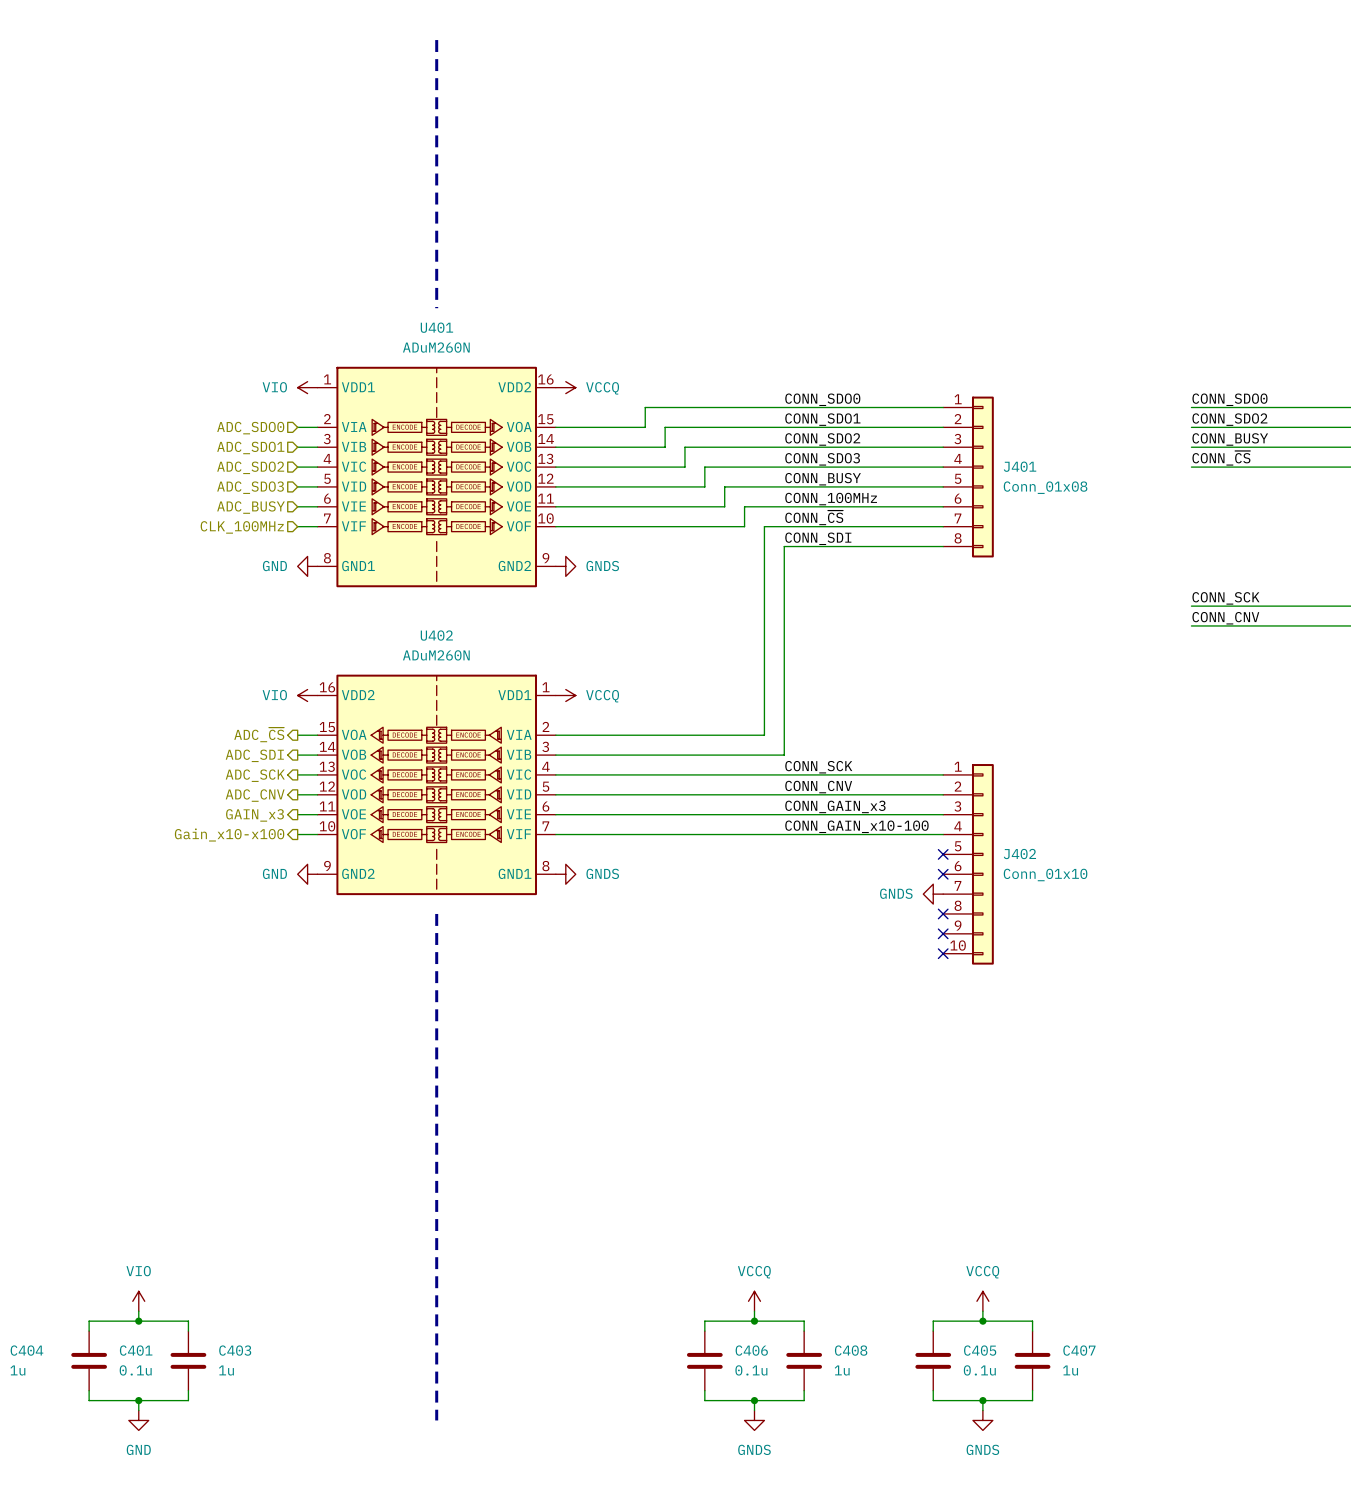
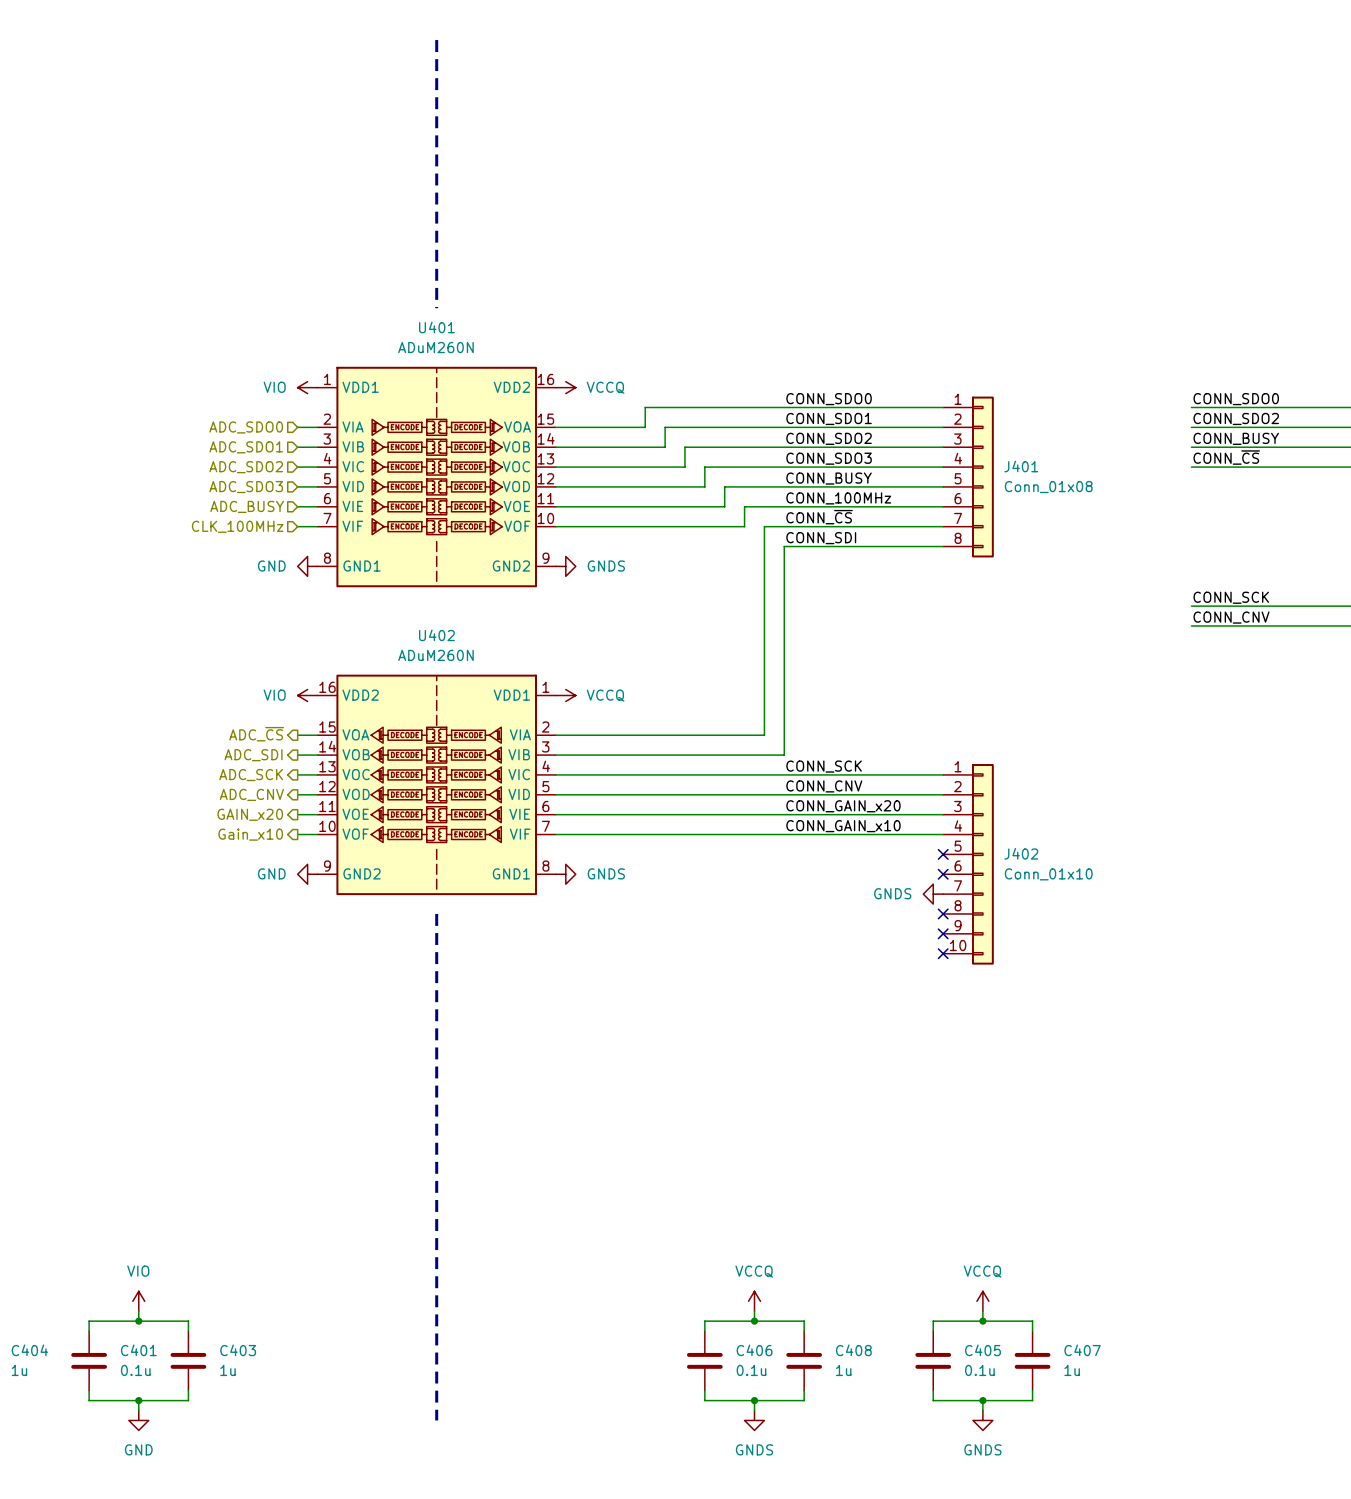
label: CONN_GAIN_x3 (835, 806) -> CONN_GAIN_x20 (843, 806)
hierarchical label: GAIN_x3 (254, 815) -> GAIN_x20 (250, 814)
label: CONN_GAIN_x10-100 (856, 826) -> CONN_GAIN_x10 (843, 826)
hierarchical label: Gain_x10-x100 (229, 835) -> Gain_x10 (250, 834)

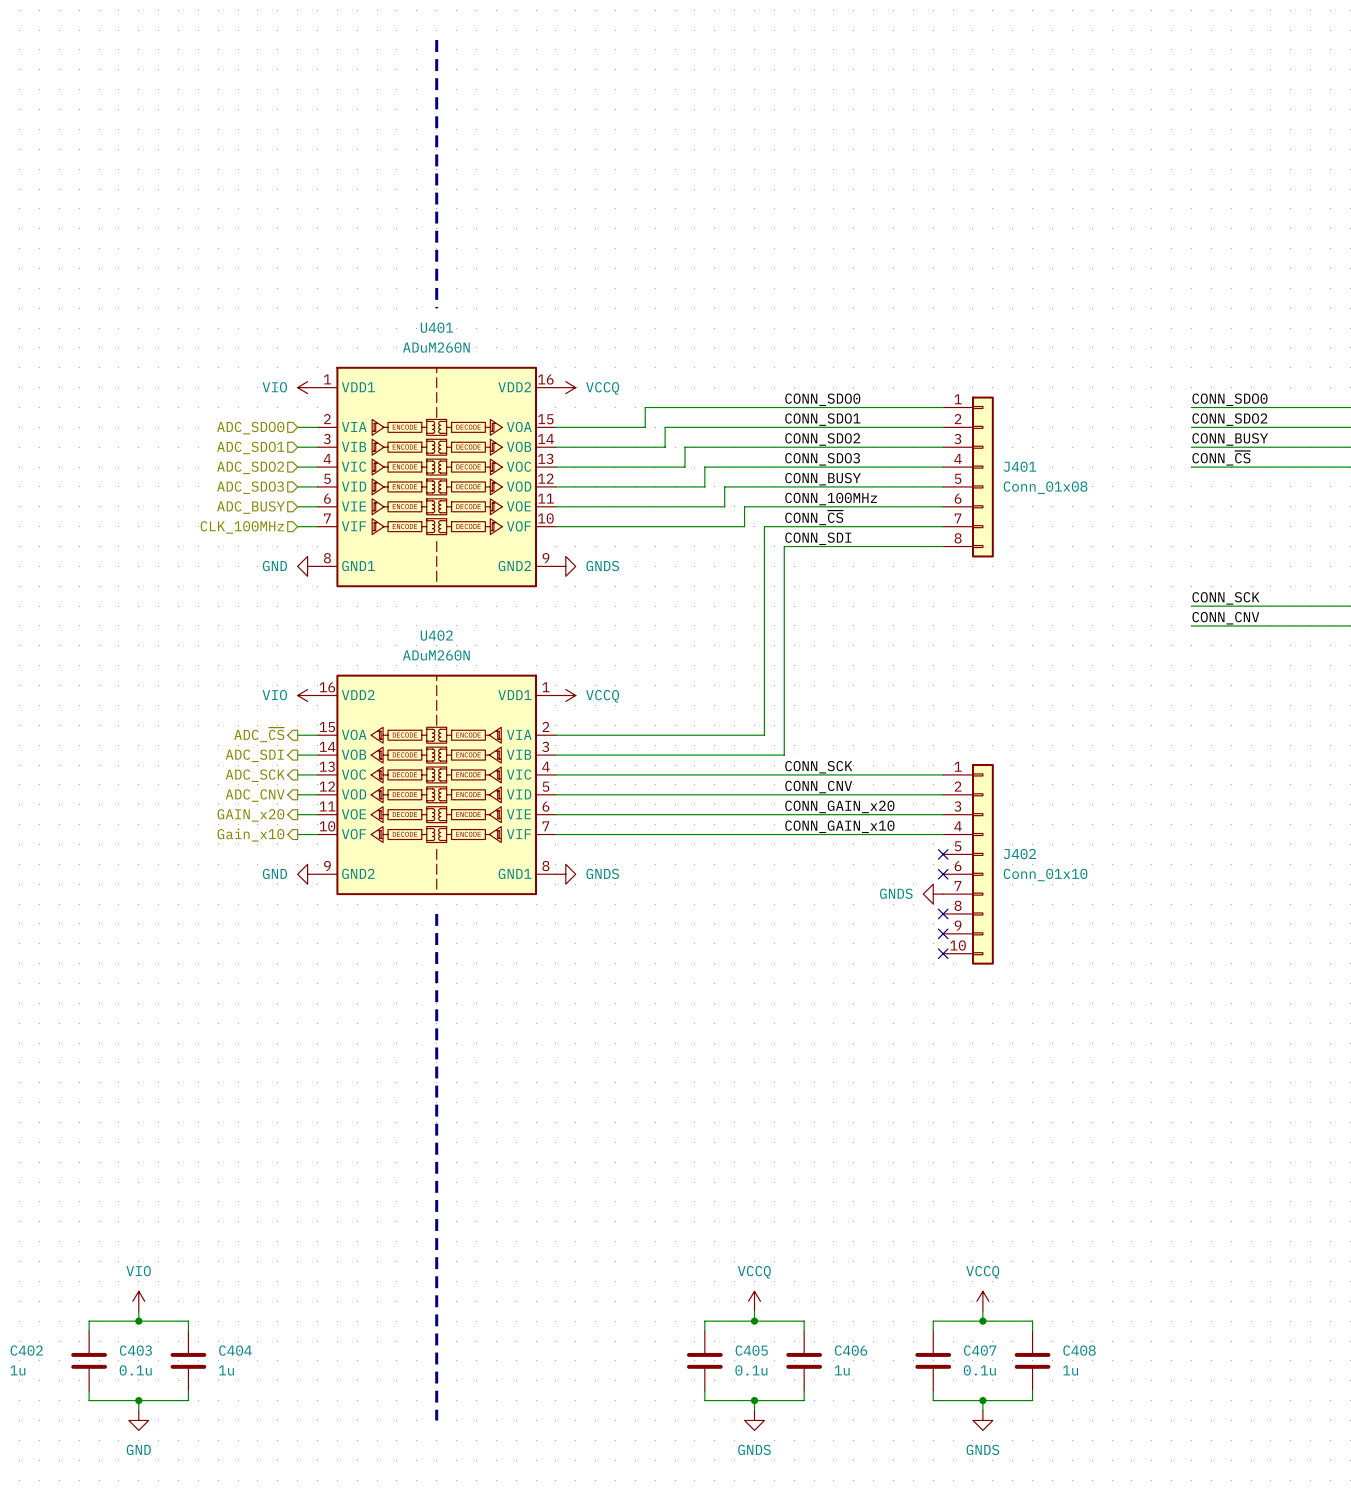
C404 name: C404 (29, 1350) -> C402 (26, 1350)
C401 name: C401 (138, 1350) -> C403 (135, 1350)
C403 name: C403 (238, 1350) -> C404 (235, 1350)
C406 name: C406 (754, 1350) -> C405 (751, 1350)
C408 name: C408 (853, 1350) -> C406 (851, 1350)
C405 name: C405 (982, 1350) -> C407 (980, 1350)
C407 name: C407 (1082, 1350) -> C408 (1079, 1350)

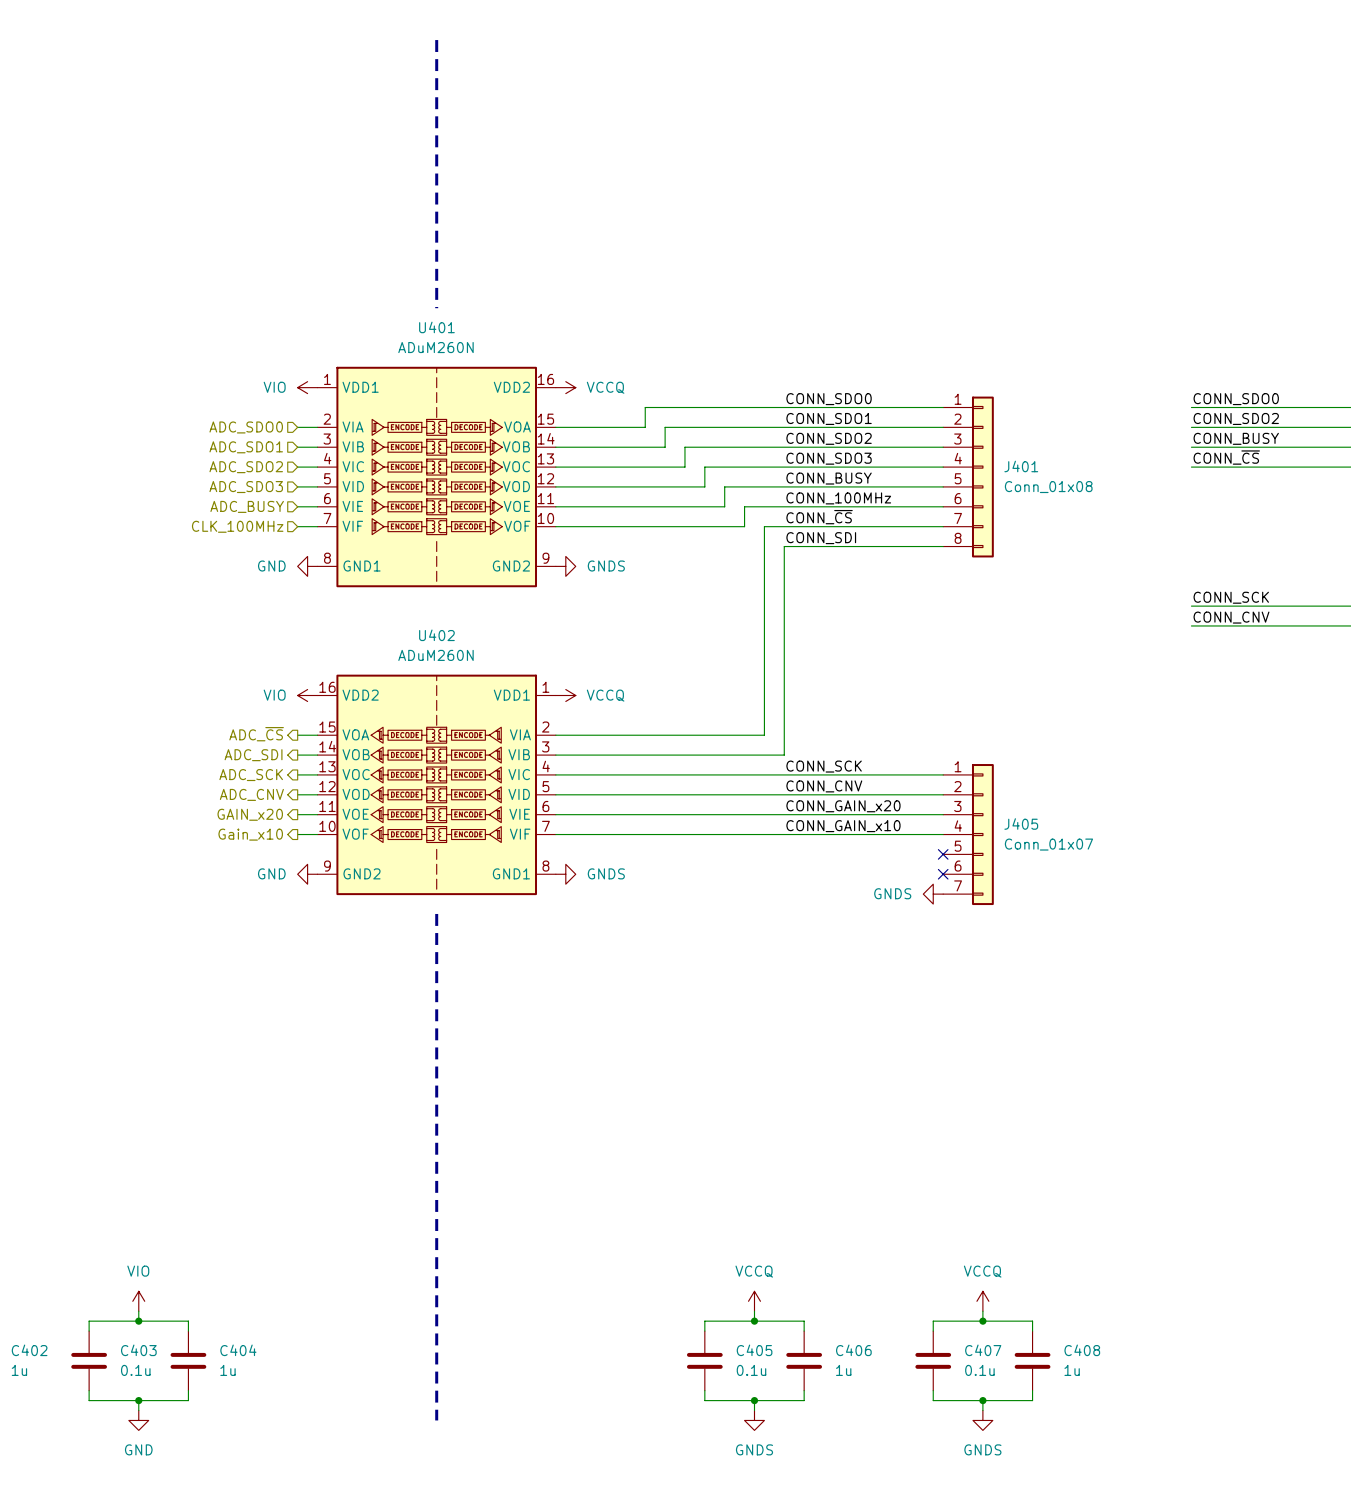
J405: none -> Conn_01x07 (968, 834)
J402: Conn_01x10 (968, 864) -> none
no-connect mark: (943, 913) -> none
no-connect mark: (943, 933) -> none
no-connect mark: (943, 953) -> none

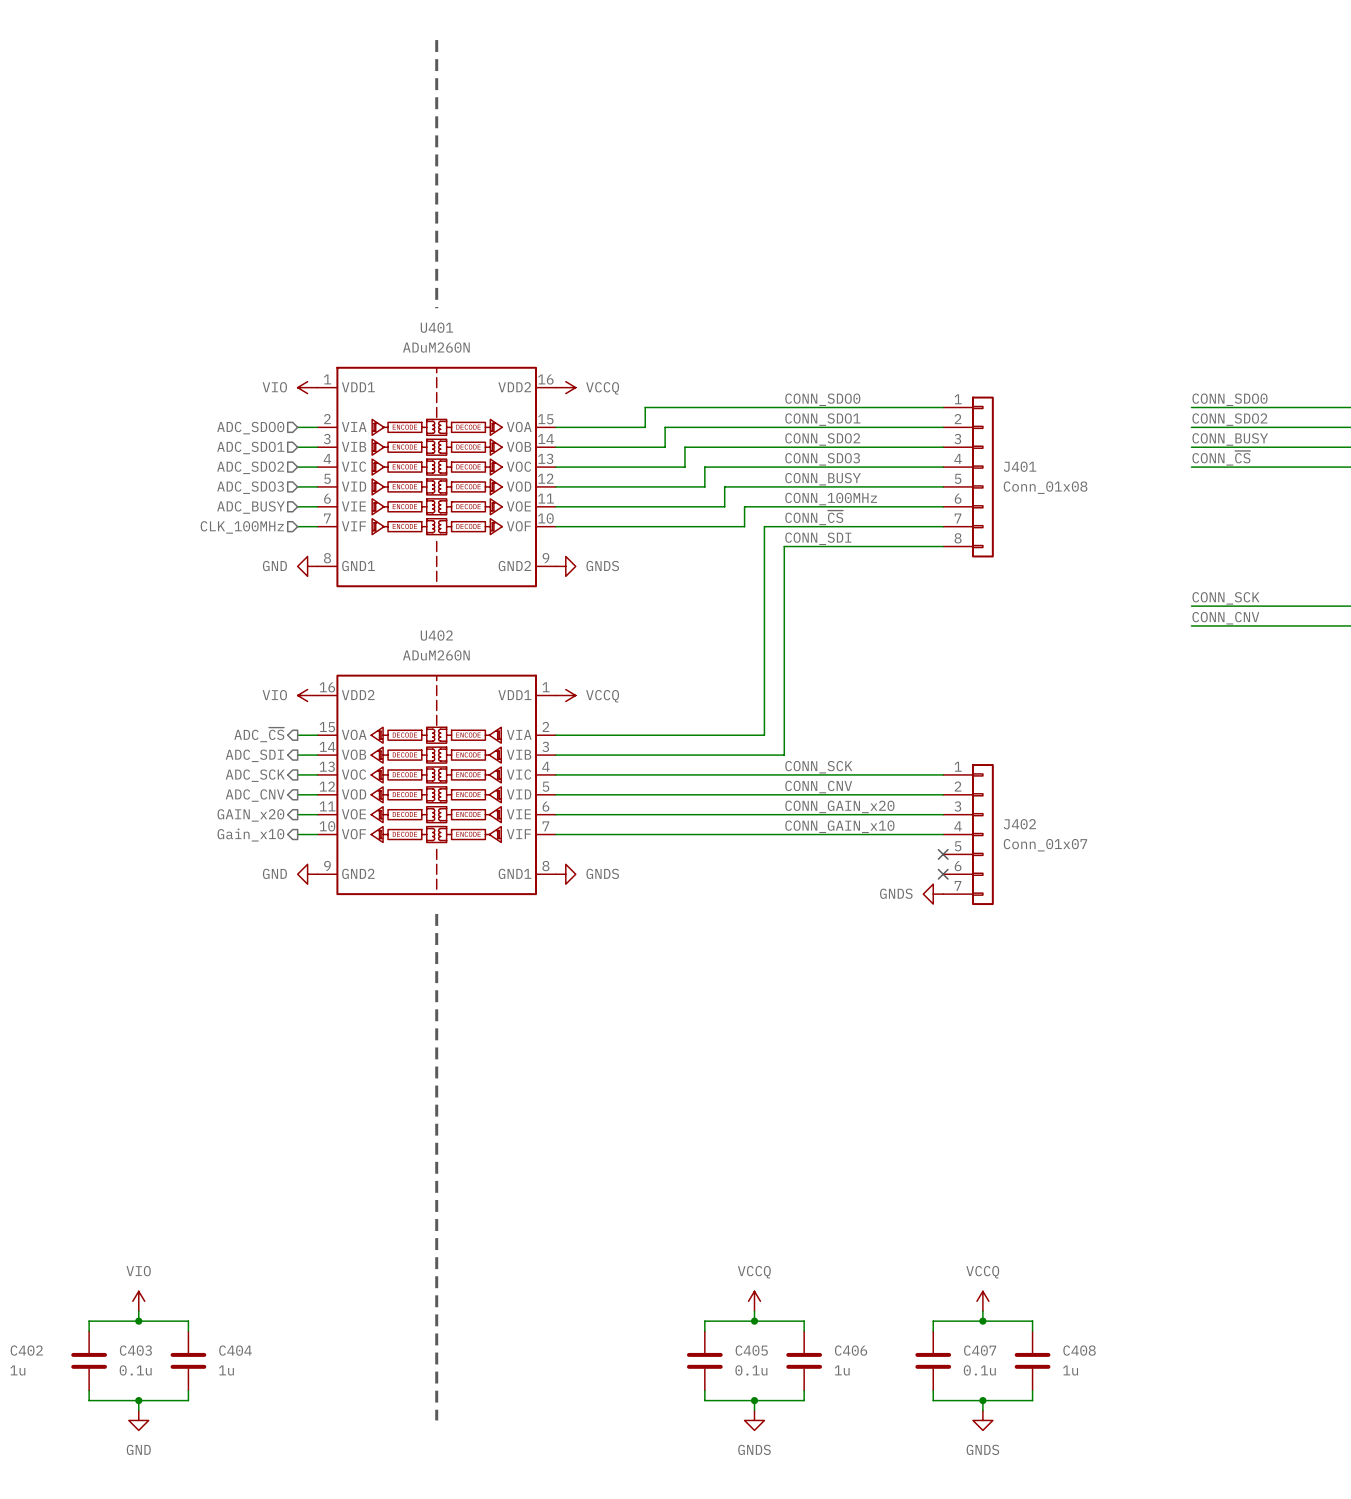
J405 name: J405 (1021, 823) -> J402 (1019, 824)

